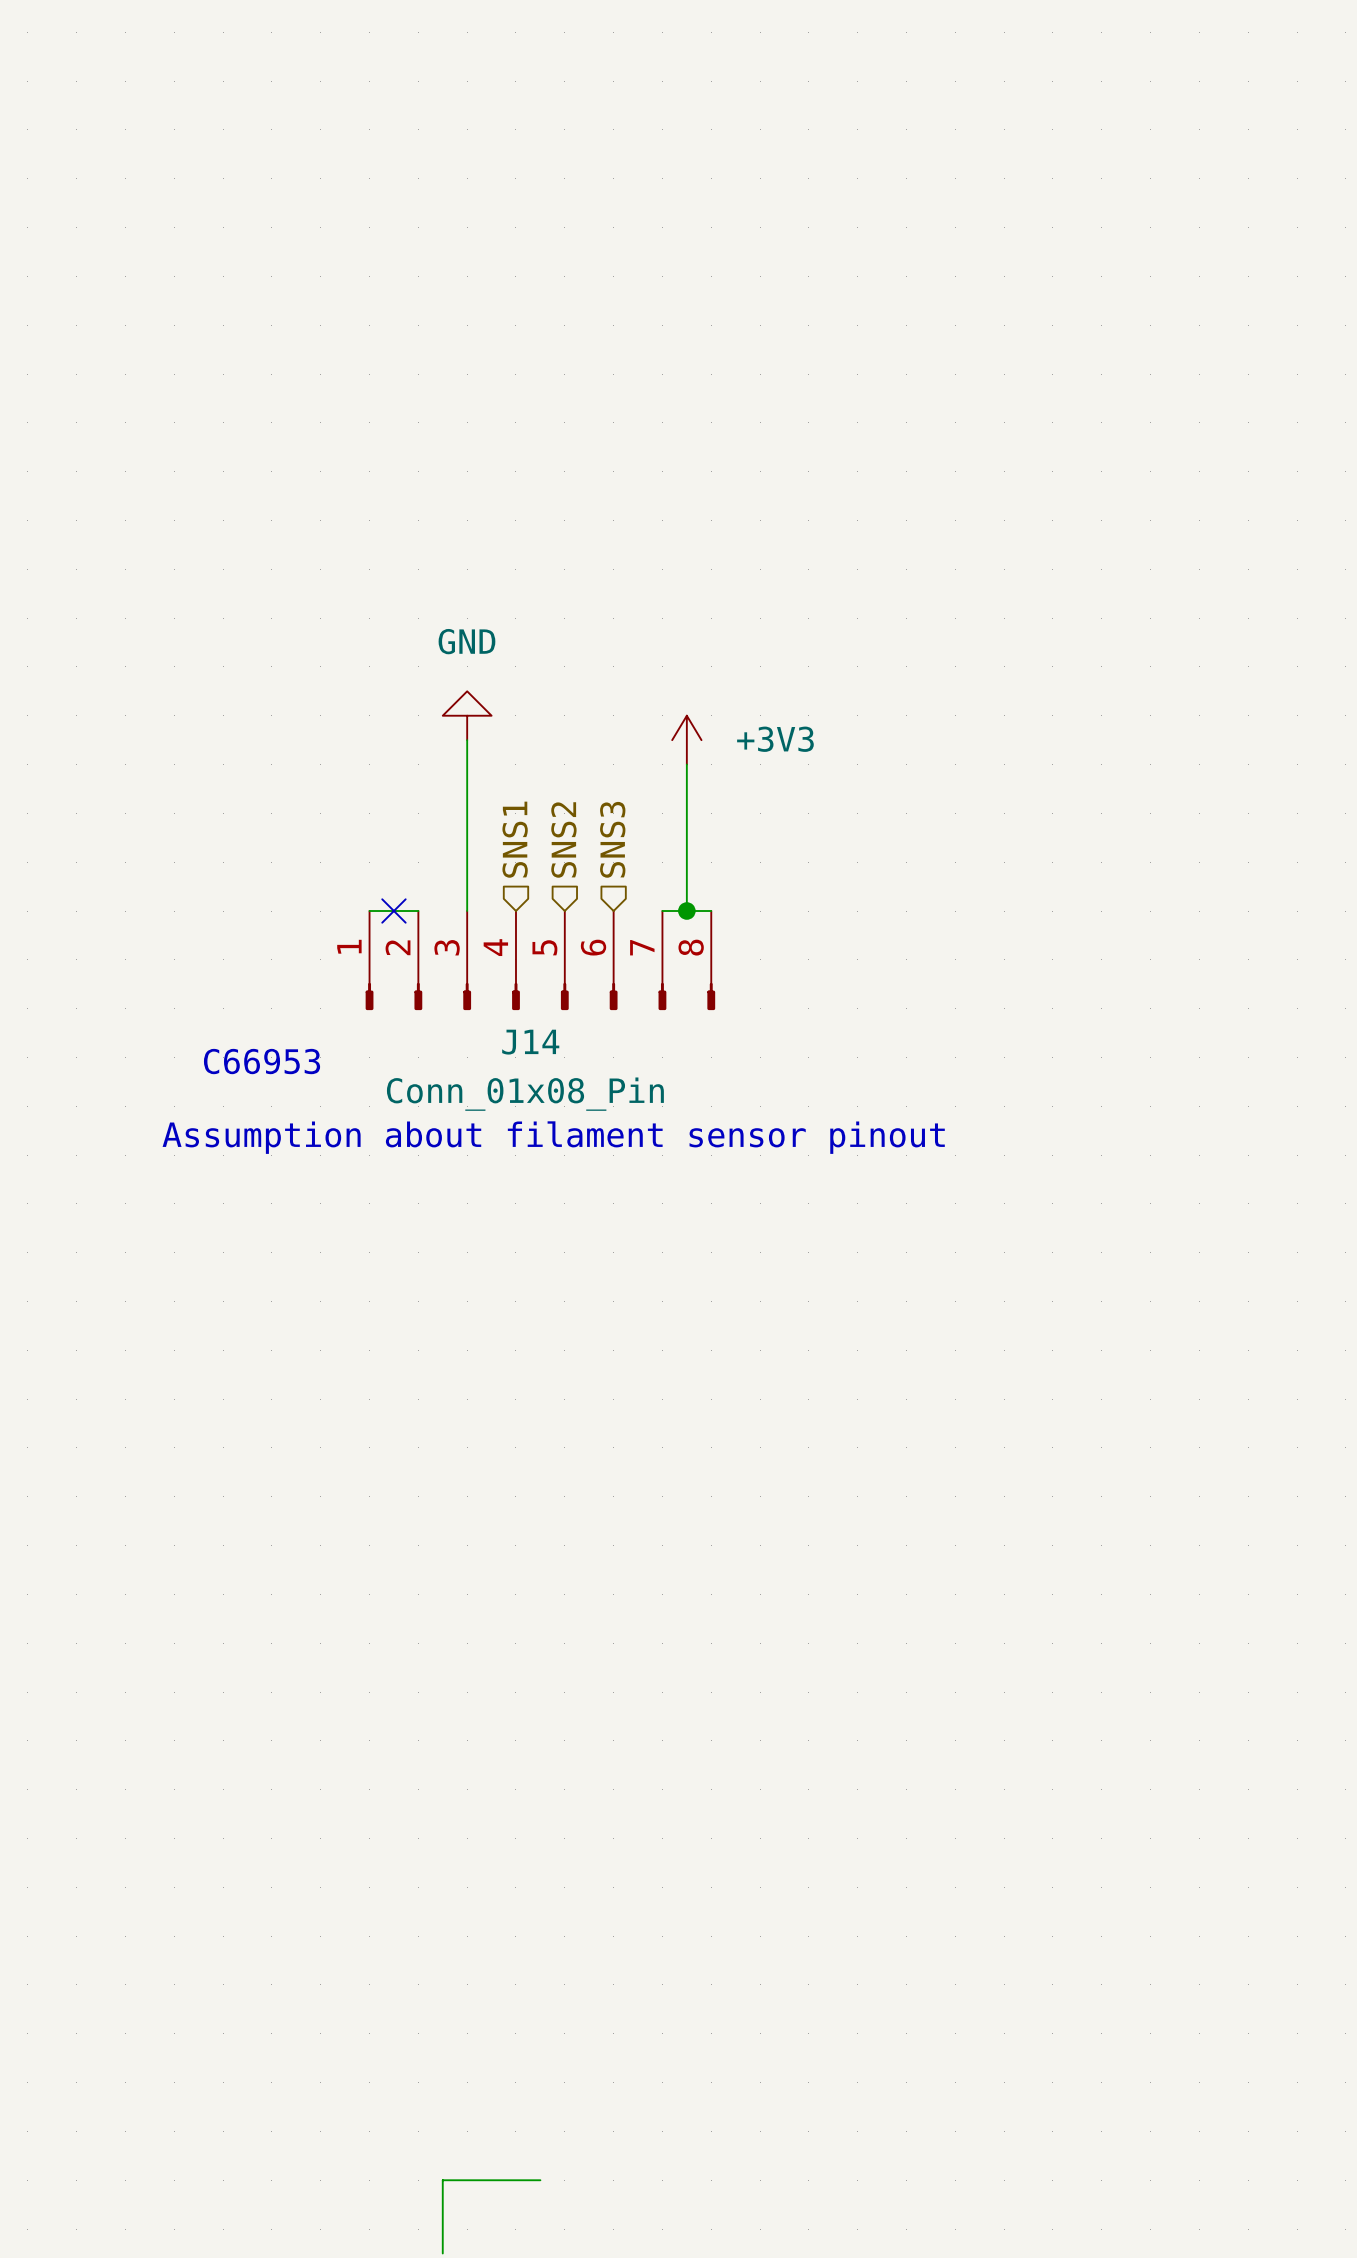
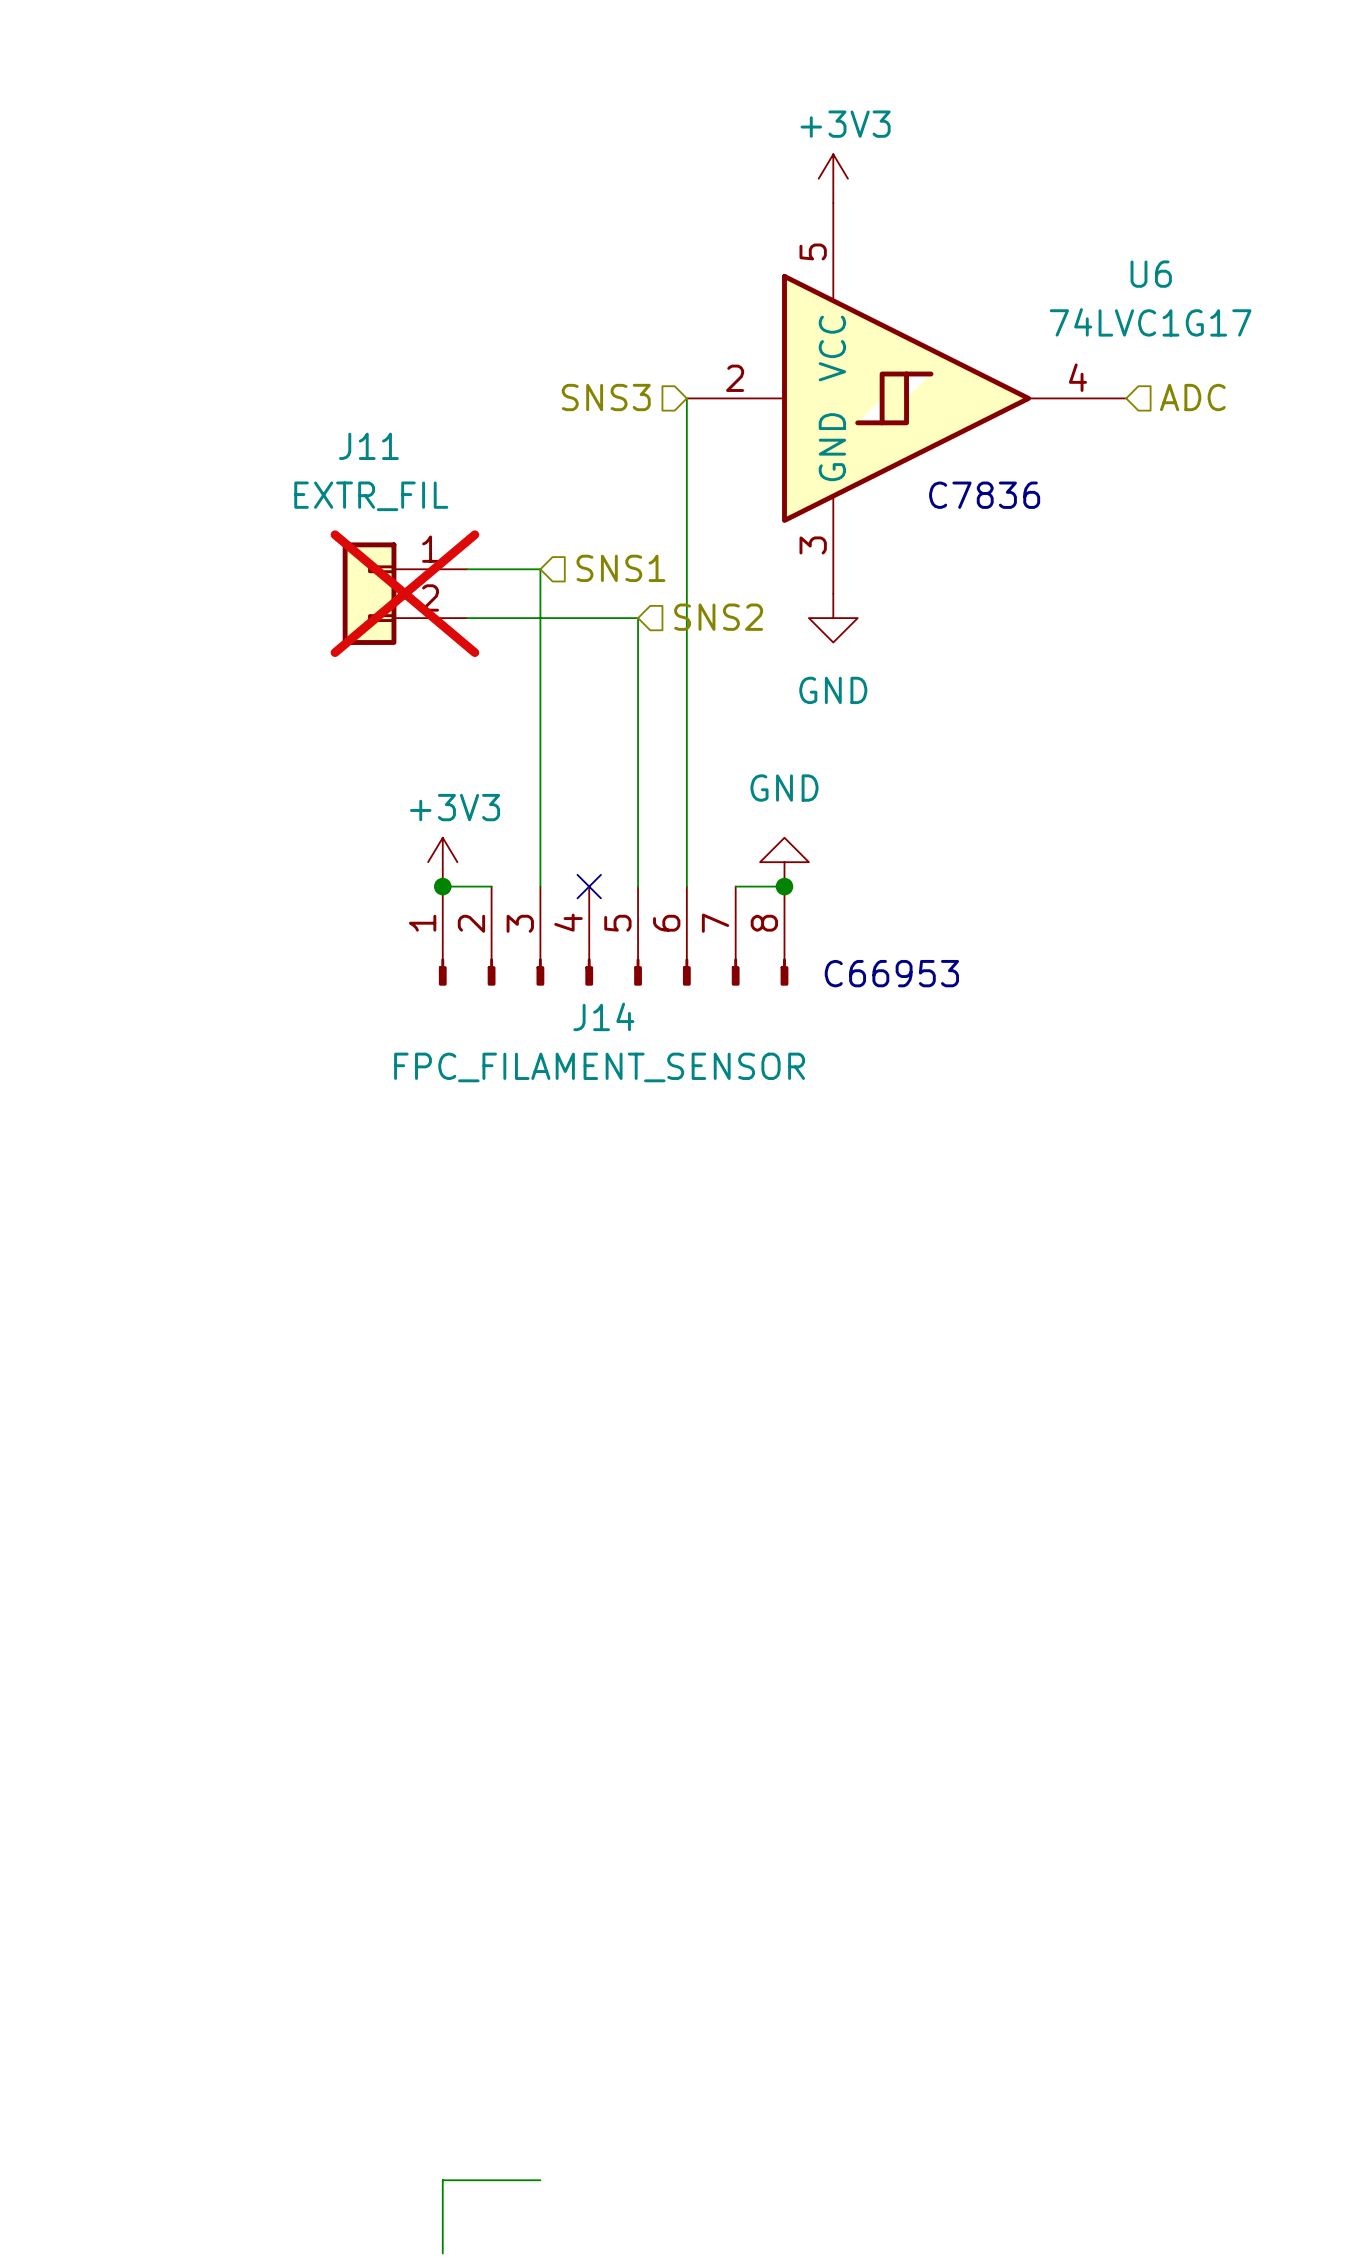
power symbol: none -> +3V3 (833, 178)
hierarchical label: none -> SNS3 (606, 397)
hierarchical label: none -> ADC (1192, 397)
wire: none -> (686, 398) (686, 764)
U6: none -> 74LVC1G17 (906, 398)
text: none -> C7836 (984, 495)
wire: none -> (467, 569) (540, 569) (540, 886)
J11: none -> EXTR_FIL (404, 593)
wire: none -> (467, 618) (638, 618) (638, 886)
power symbol: none -> GND (833, 618)
power symbol: GND (467, 715) -> none
power symbol text position: +3V3 (775, 739) -> +3V3 (455, 807)
wire: (467, 740) (467, 911) -> none
power symbol position: +3V3 (686, 740) -> +3V3 (442, 862)
hierarchical label rotation: 0° (515, 839) -> 90° clockwise (620, 568)
hierarchical label position: SNS1 (515, 839) -> SNS1 (620, 568)
hierarchical label rotation: 0° (563, 839) -> 90° clockwise (718, 617)
hierarchical label position: SNS2 (563, 839) -> SNS2 (718, 617)
hierarchical label: SNS3 (612, 839) -> none
power symbol: none -> GND (784, 862)
junction: none -> (442, 886)
no-connect mark: none -> (589, 886)
wire: (369, 911) (418, 911) -> (442, 886) (491, 886)
no-connect mark: (393, 911) -> none
wire: (662, 911) (711, 911) -> (735, 886) (784, 886)
junction position: (686, 911) -> (784, 886)
J14 position: (540, 960) -> (613, 936)
text: none -> C66953 (891, 973)
text: C66953 (262, 1061) -> none
J14 value: Conn_01x08_Pin (525, 1094) -> FPC_FILAMENT_SENSOR (599, 1067)
text: Assumption about filament sensor pinout (553, 1137) -> none

